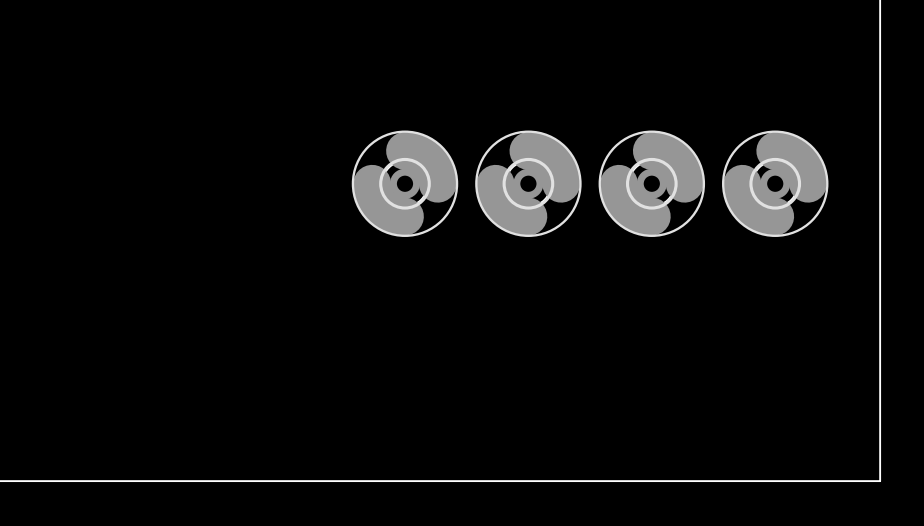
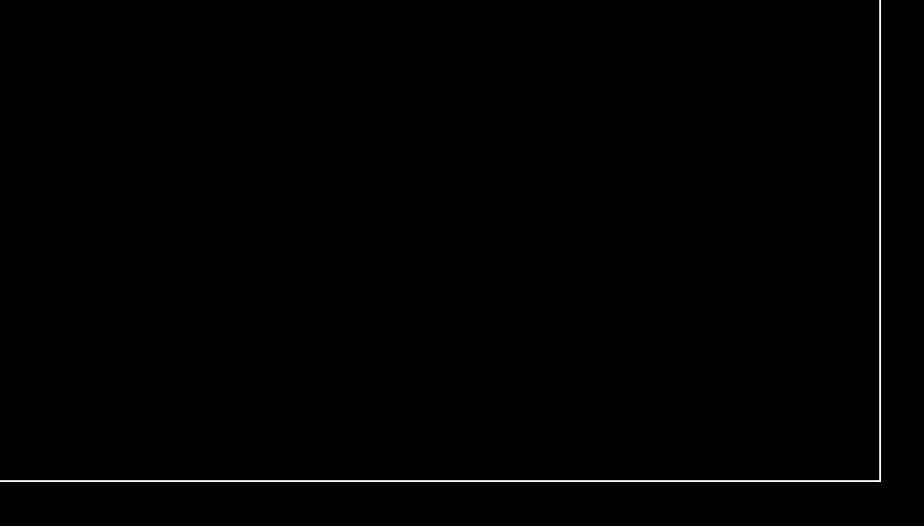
part: (404, 183) -> none
part: (528, 183) -> none
part: (651, 183) -> none
part: (775, 183) -> none

